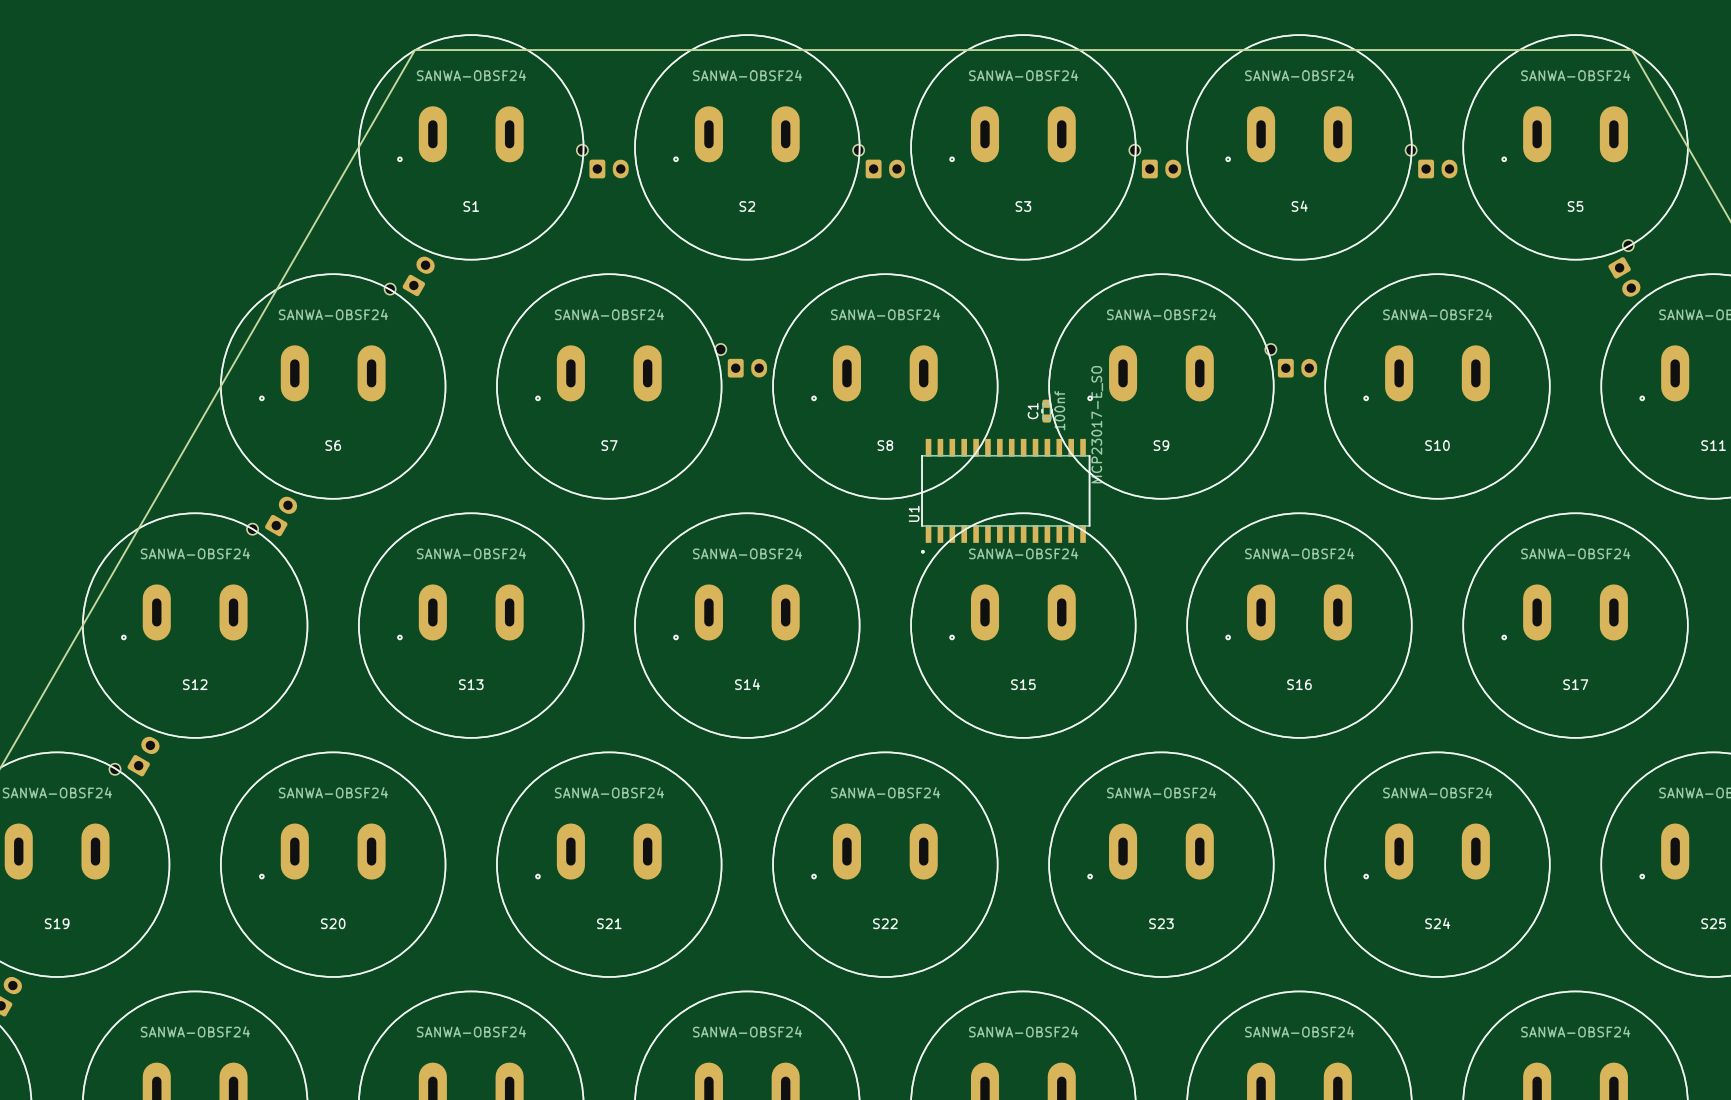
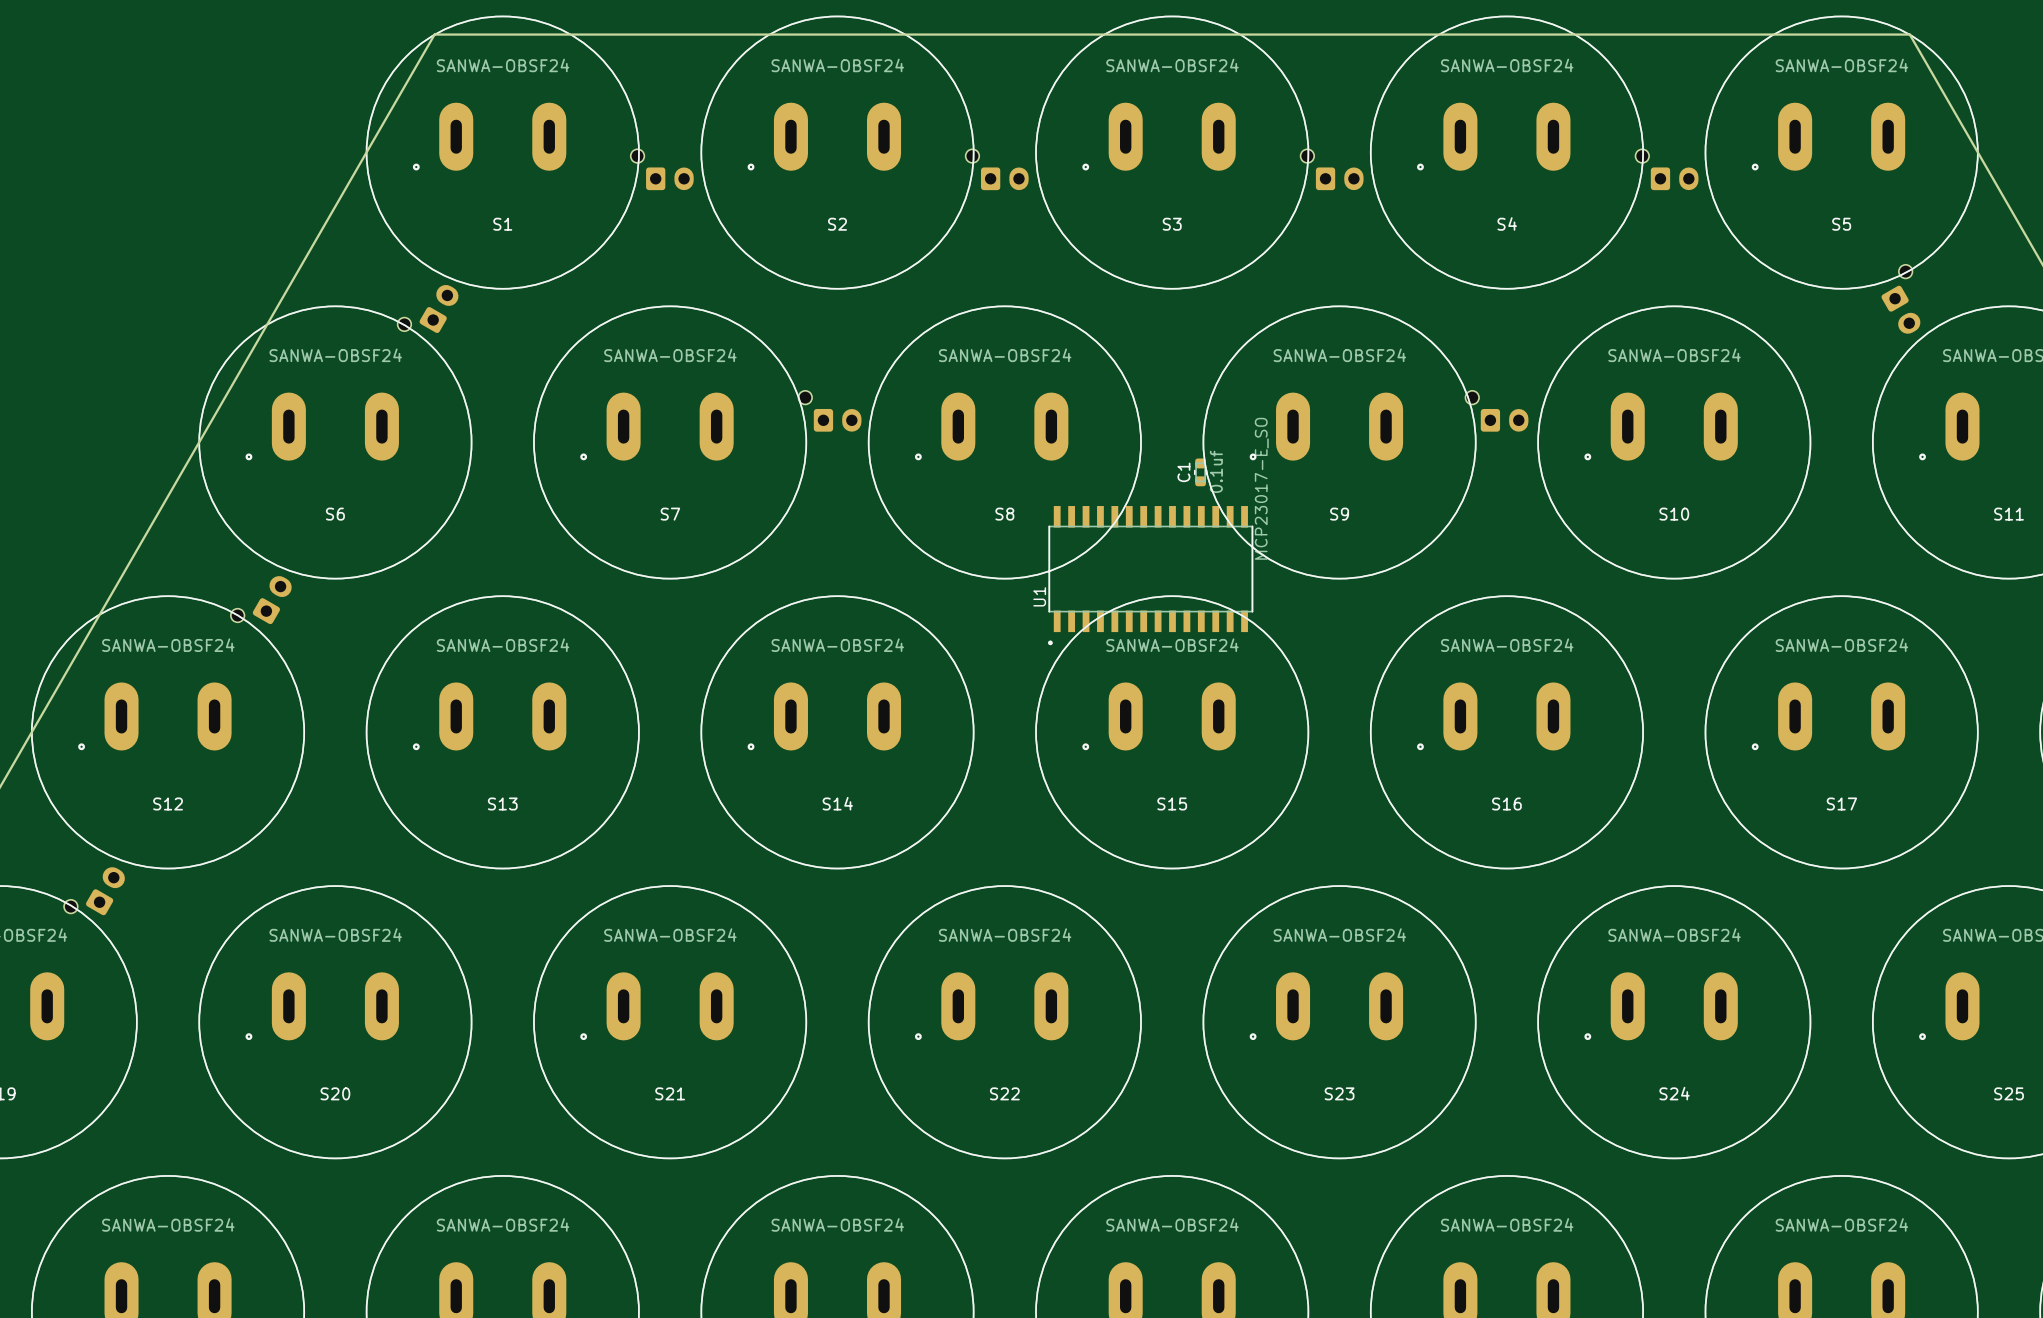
C1 value: 100nf (1059, 410) -> 0.1uf (1216, 471)

